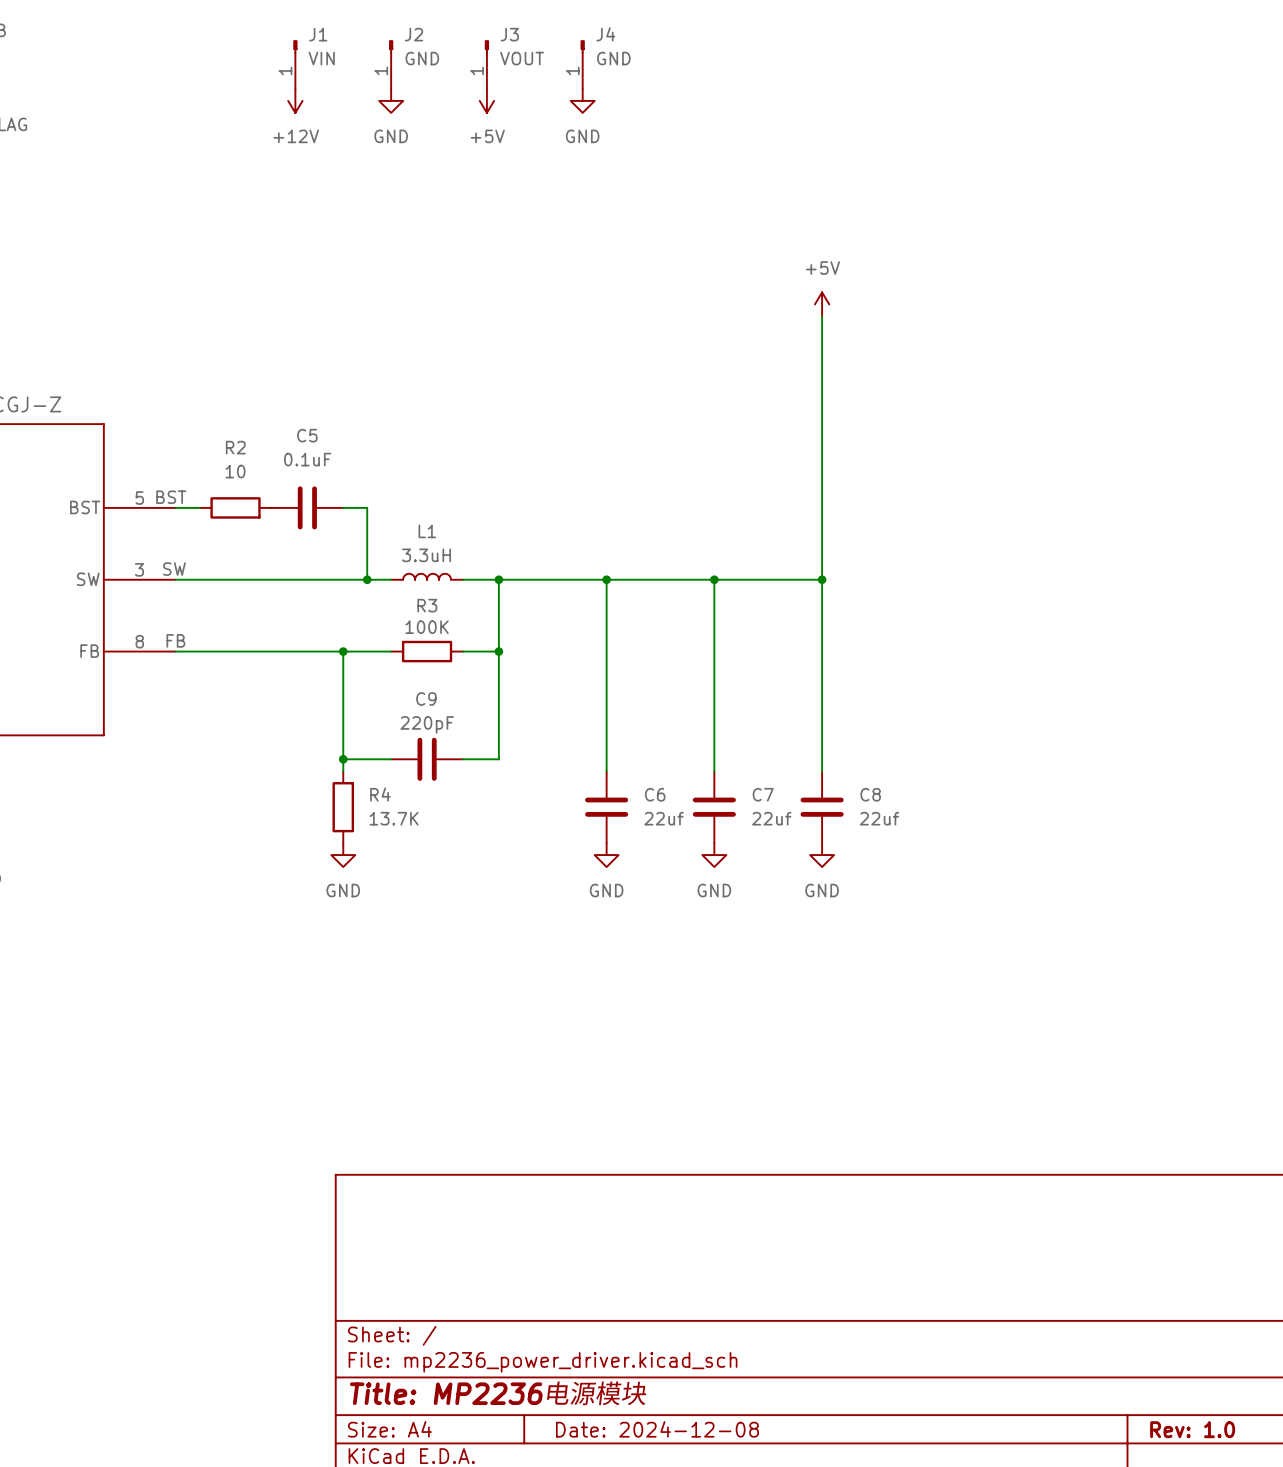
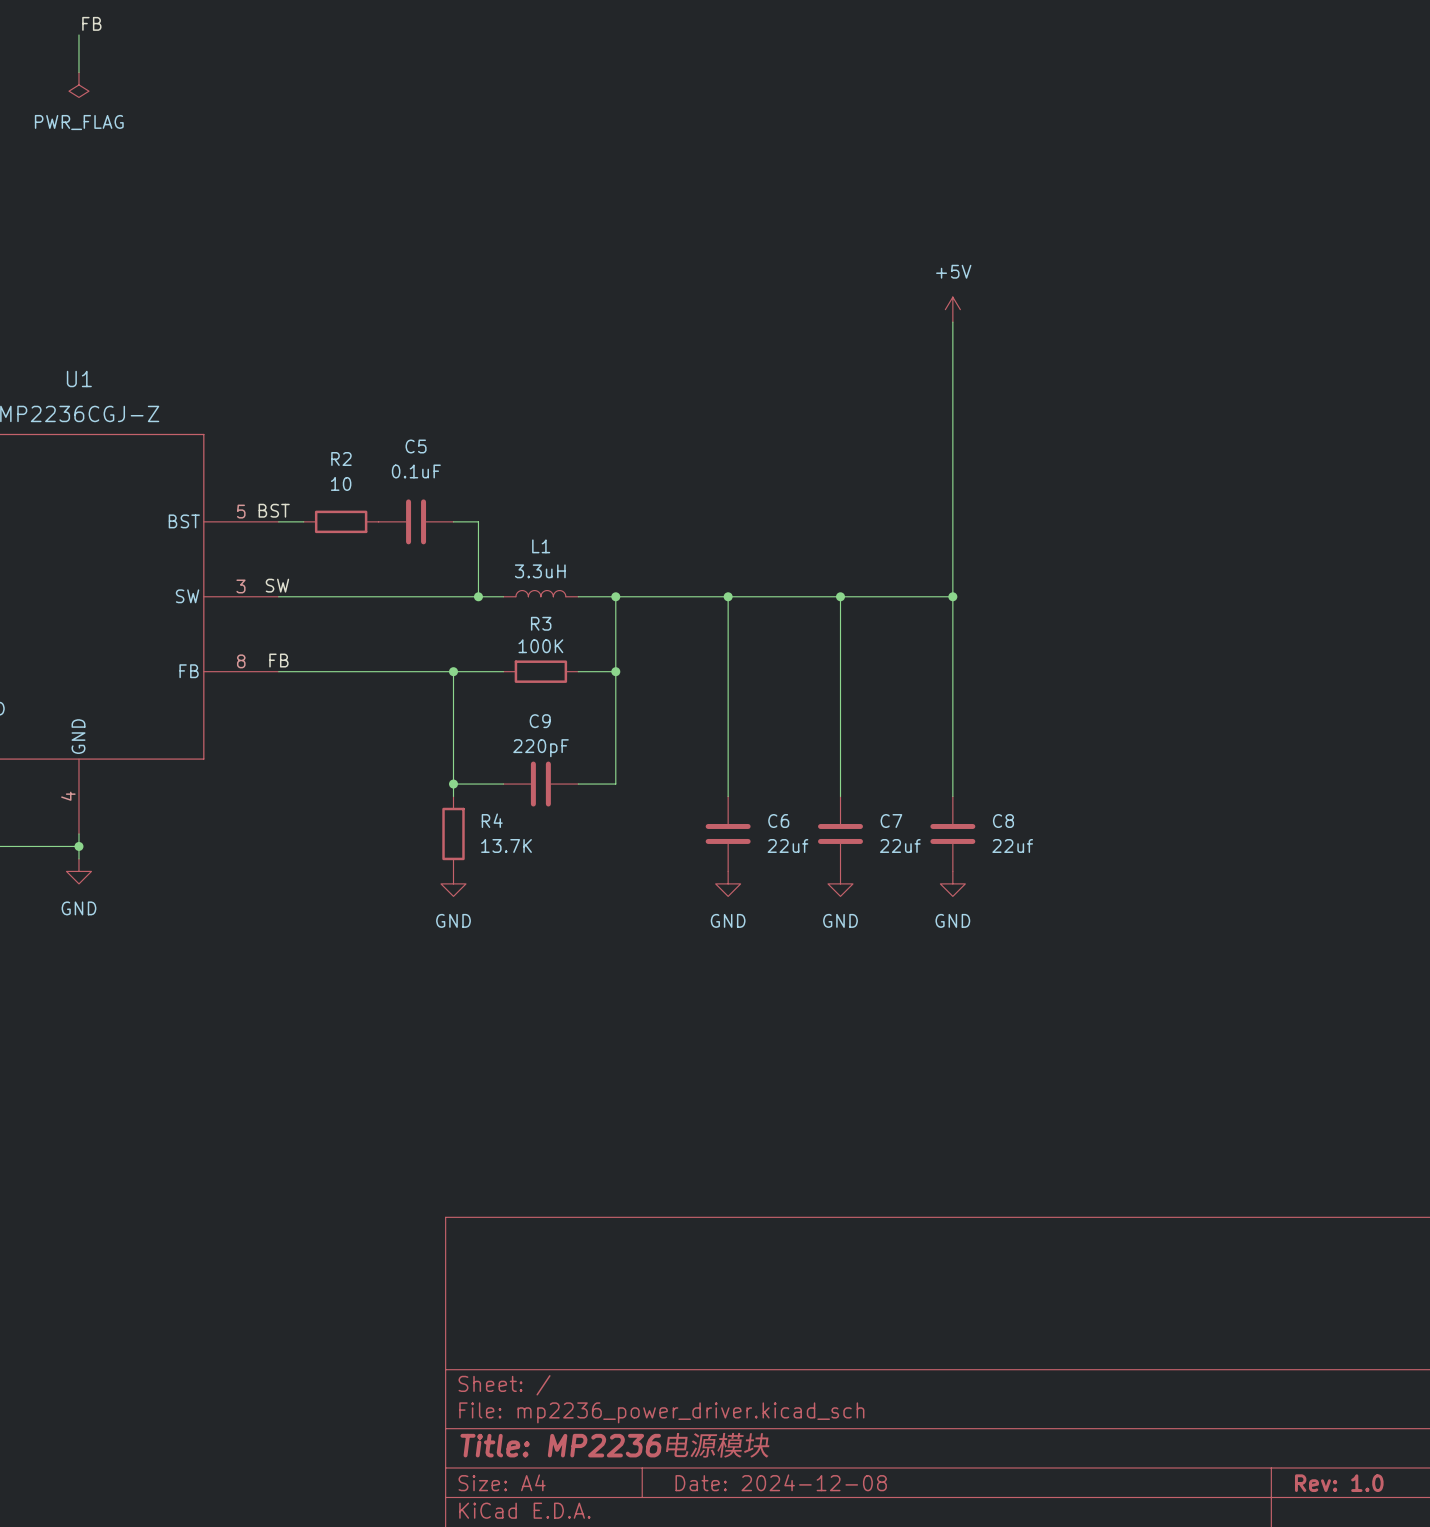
J1: VIN (295, 64) -> none
J2: GND (391, 64) -> none
J3: VOUT (486, 64) -> none
J4: GND (582, 64) -> none
power symbol: +12V (295, 100) -> none
power symbol: GND (391, 100) -> none
power symbol: +5V (486, 100) -> none
power symbol: GND (582, 100) -> none

